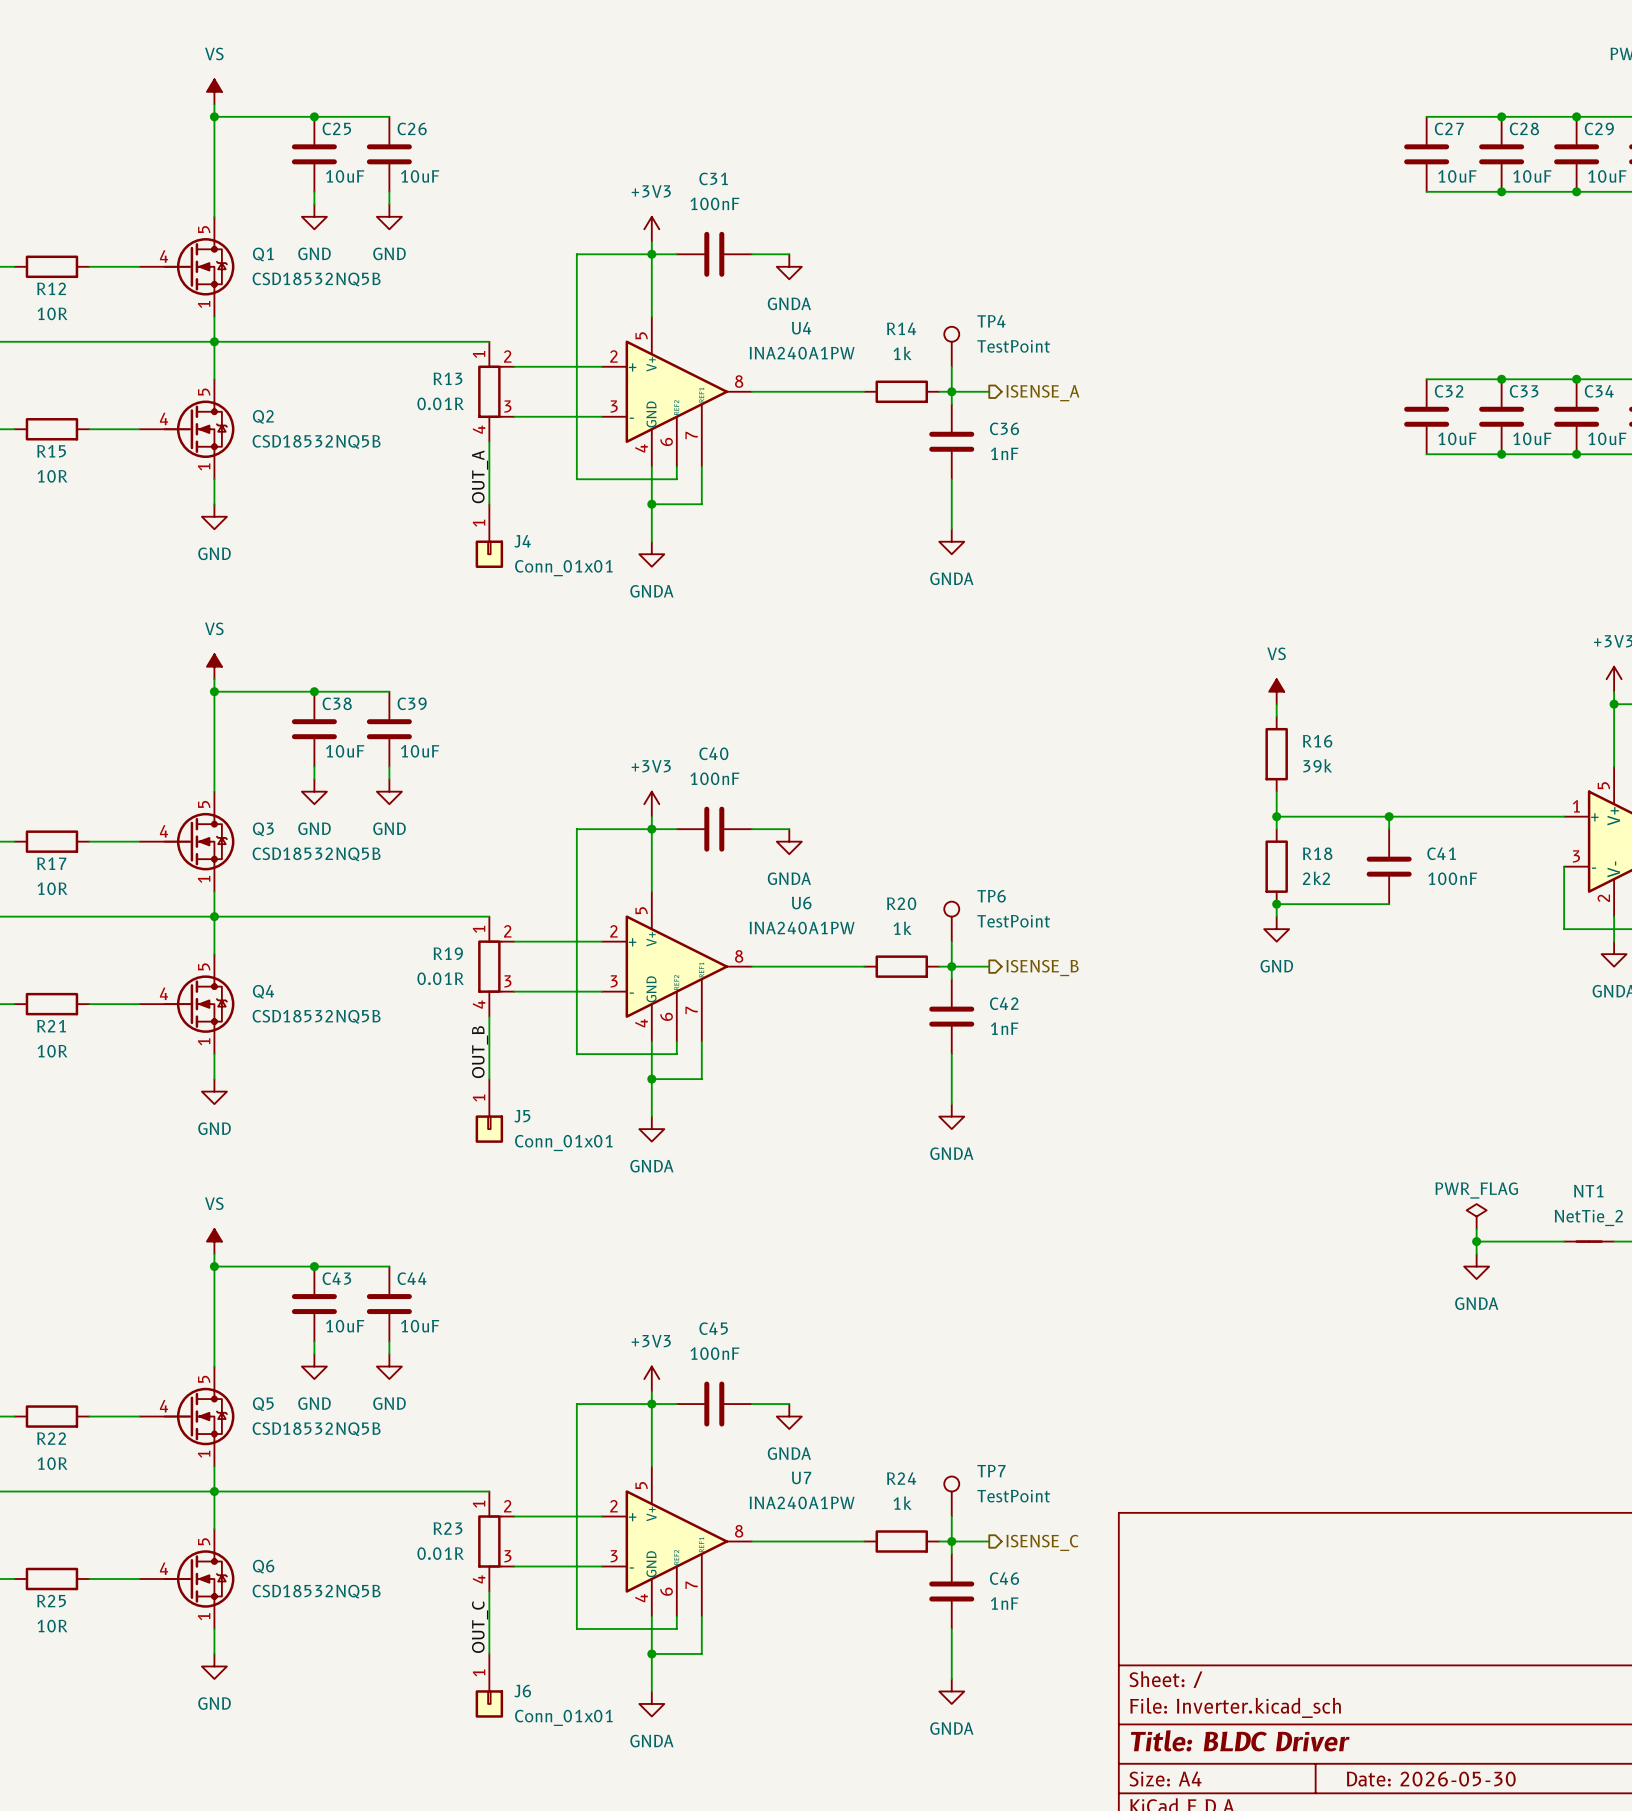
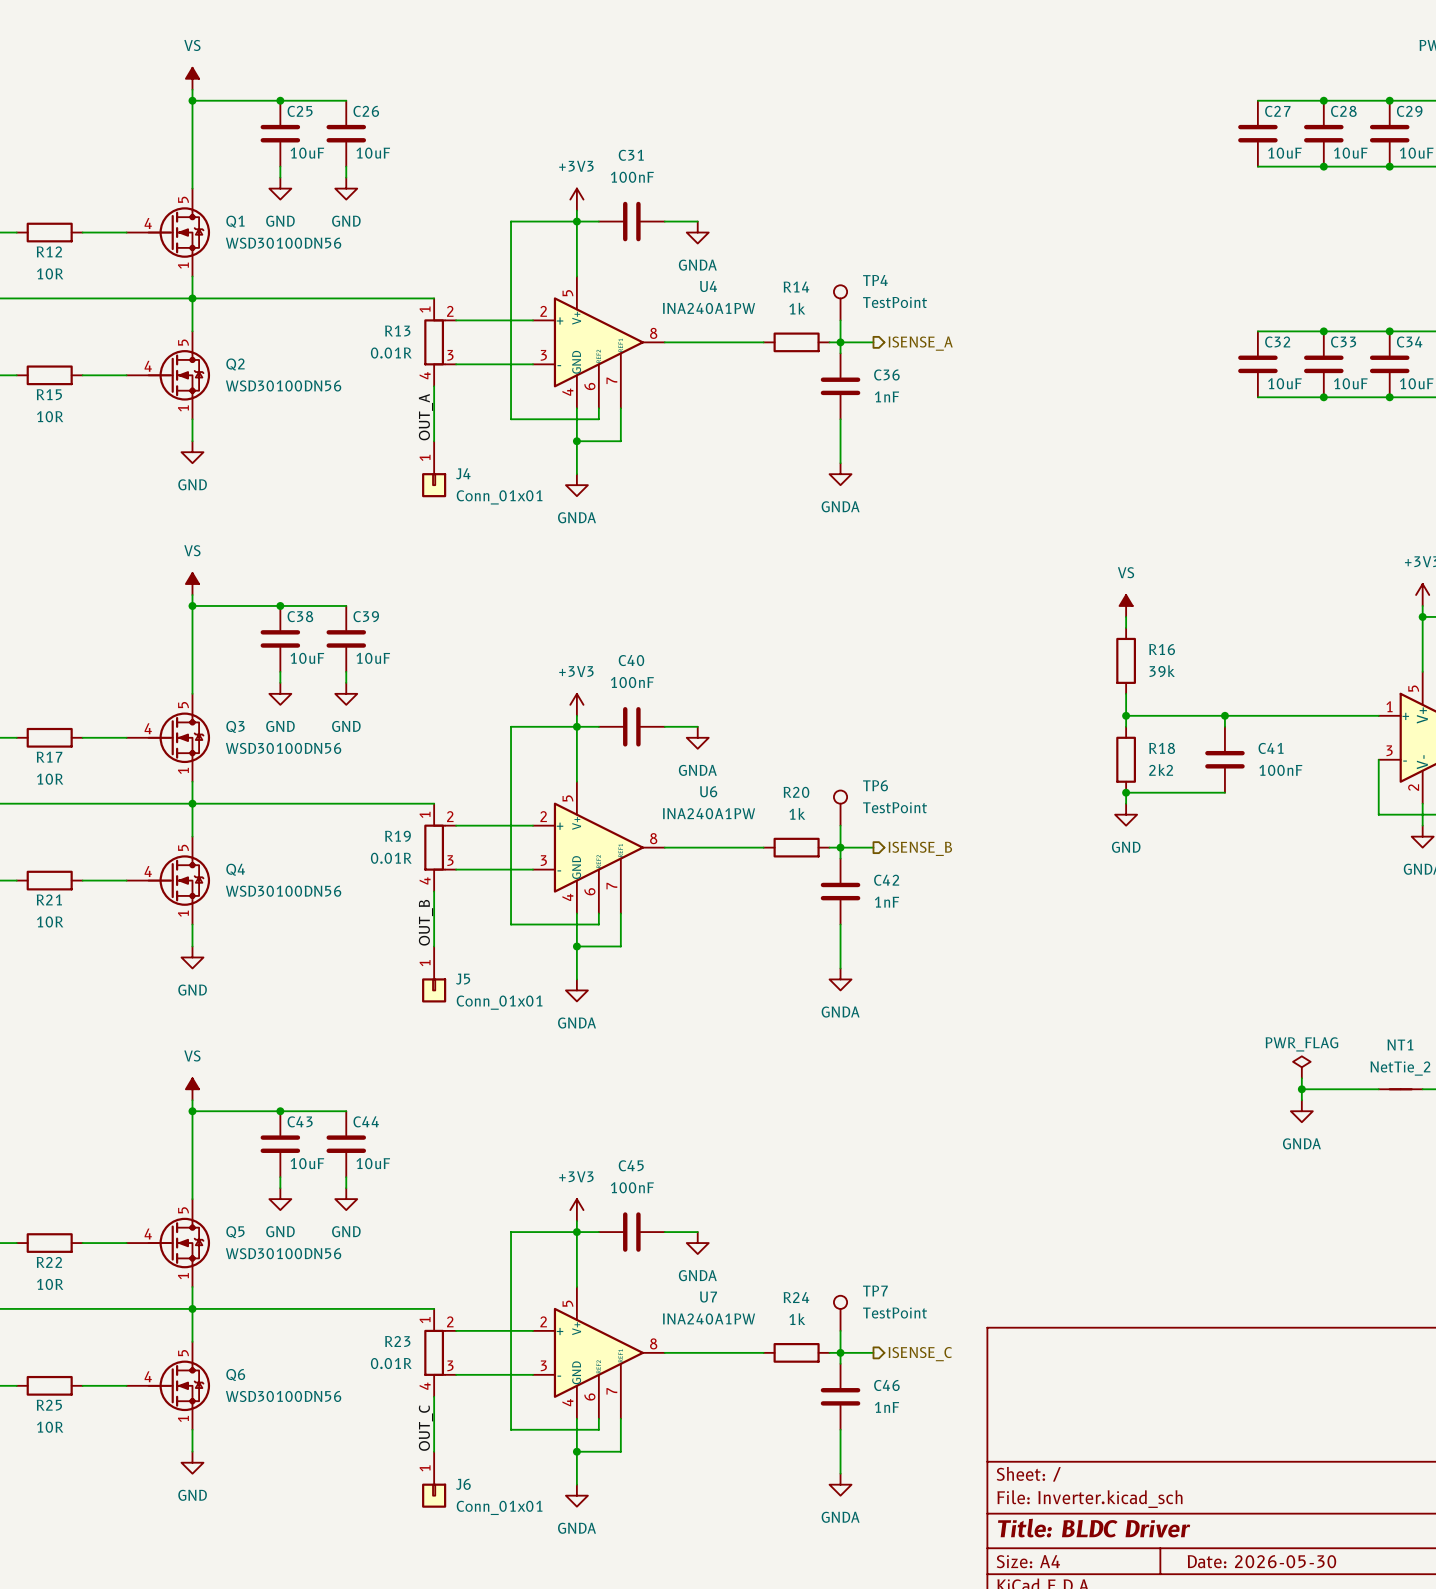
Q1 value: CSD18532NQ5B (316, 279) -> WSD30100DN56 (283, 243)
Q2 value: CSD18532NQ5B (316, 441) -> WSD30100DN56 (283, 385)
Q3 value: CSD18532NQ5B (316, 854) -> WSD30100DN56 (283, 748)
Q4 value: CSD18532NQ5B (316, 1016) -> WSD30100DN56 (283, 891)
Q5 value: CSD18532NQ5B (316, 1429) -> WSD30100DN56 (283, 1253)
Q6 value: CSD18532NQ5B (316, 1591) -> WSD30100DN56 (283, 1396)

